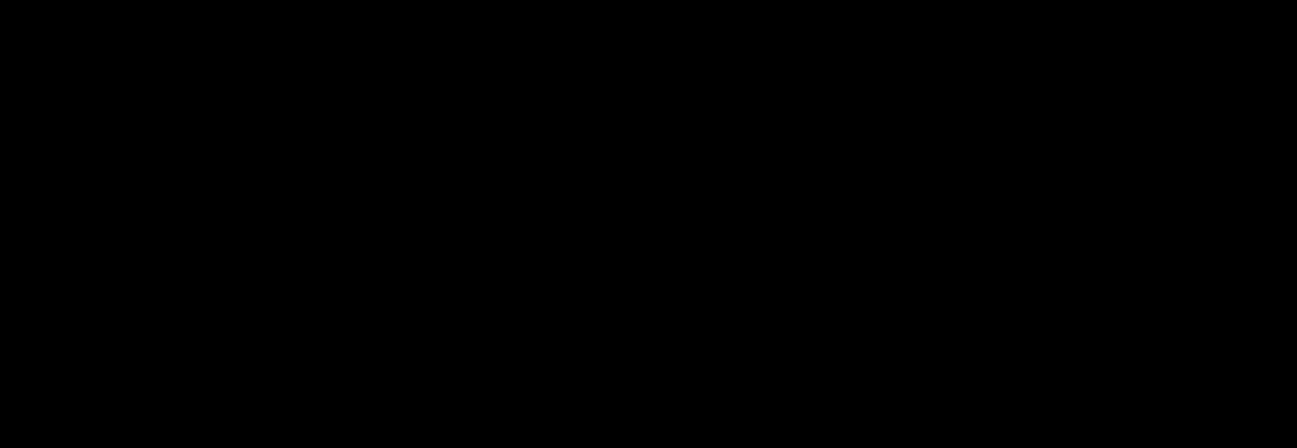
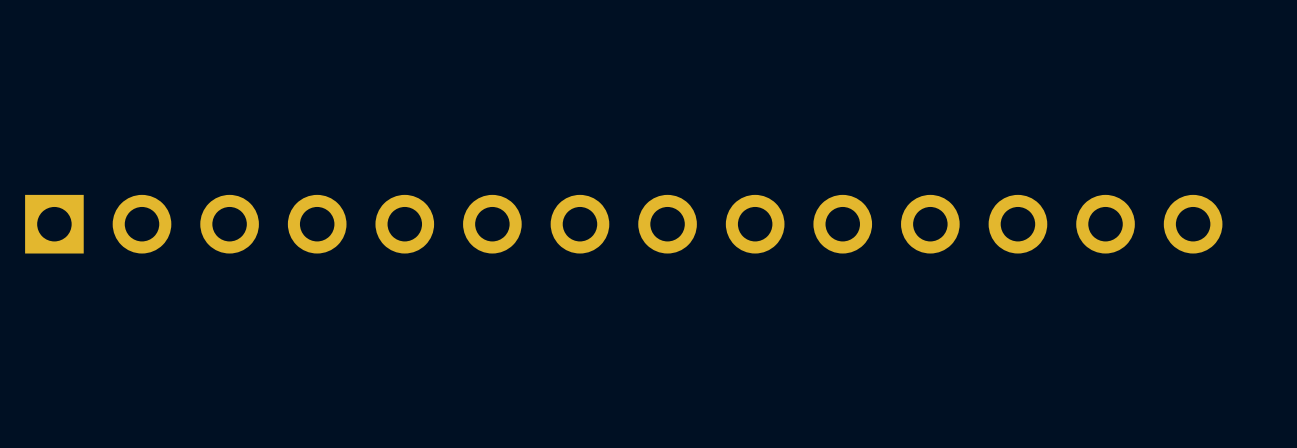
part: none -> (623, 224)

